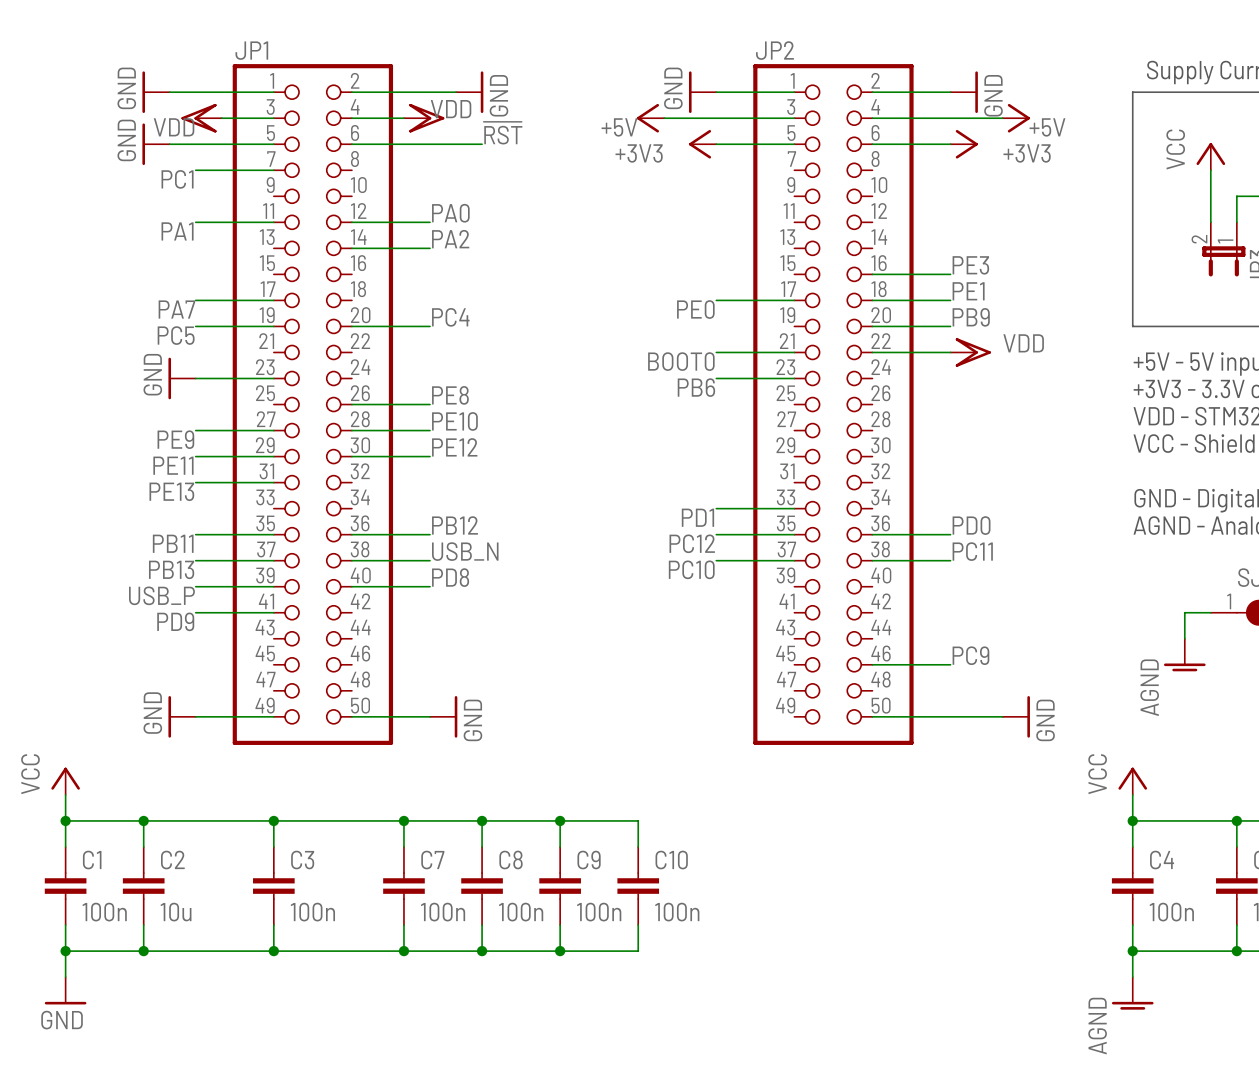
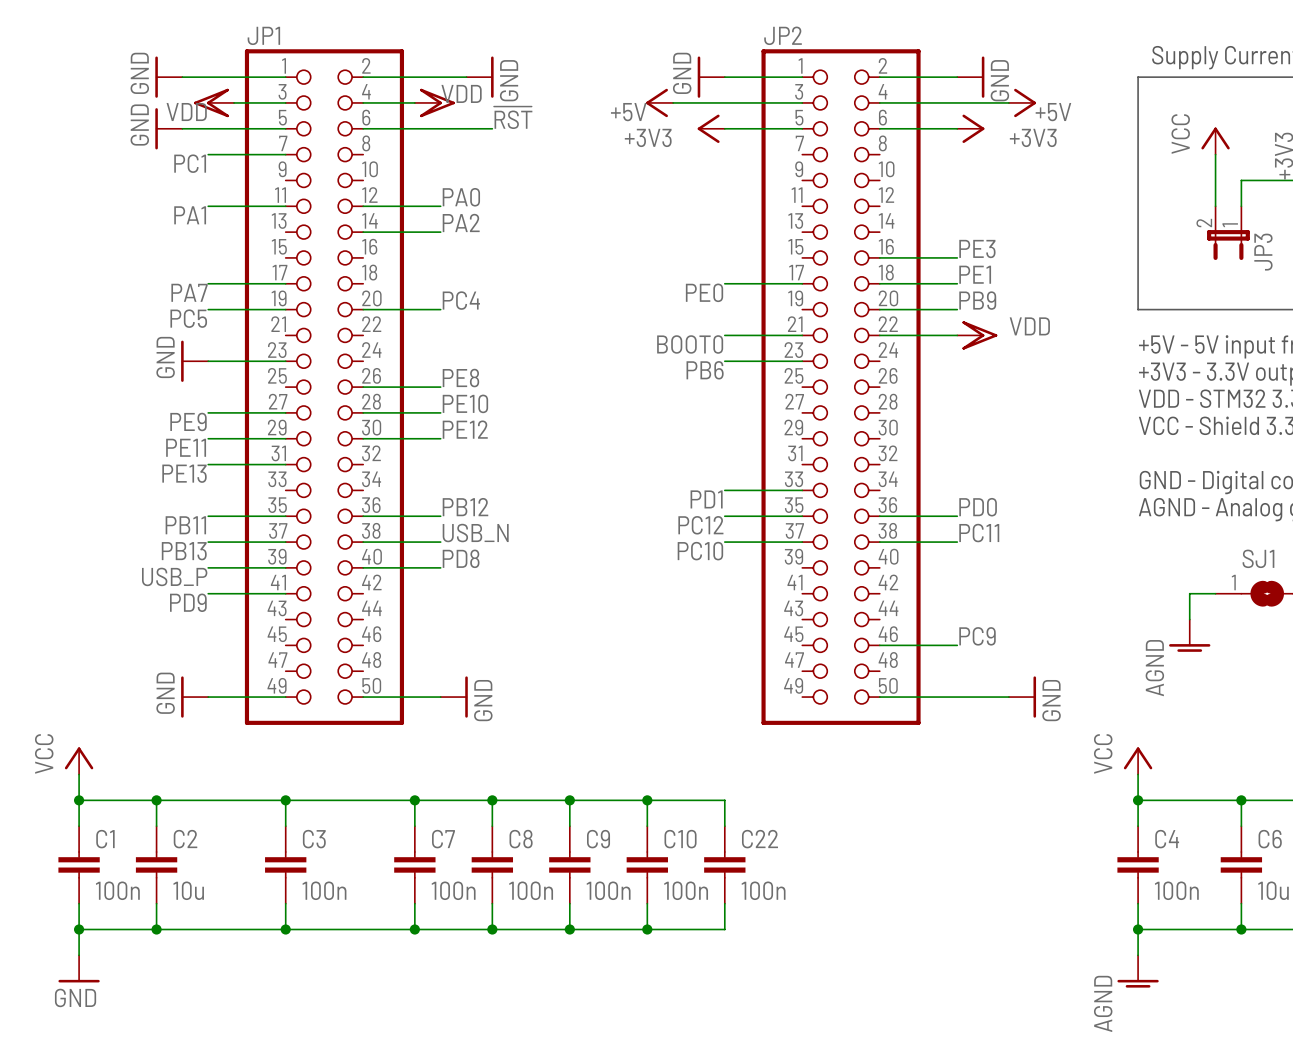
wire: none -> (647, 800) (724, 800) (724, 826)
junction: none -> (647, 800)
C22: none -> 100n (724, 864)
wire: none -> (724, 903) (724, 929) (647, 929)
junction: none -> (647, 929)

